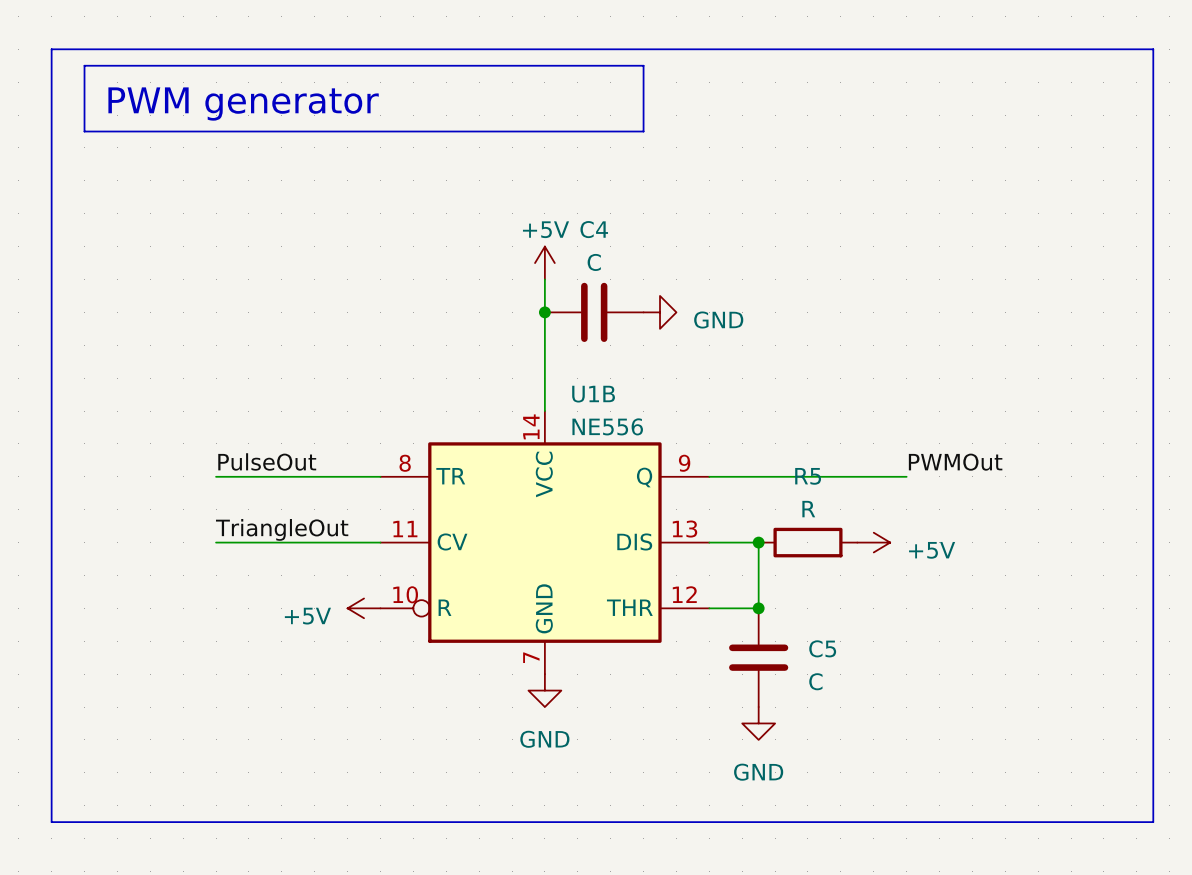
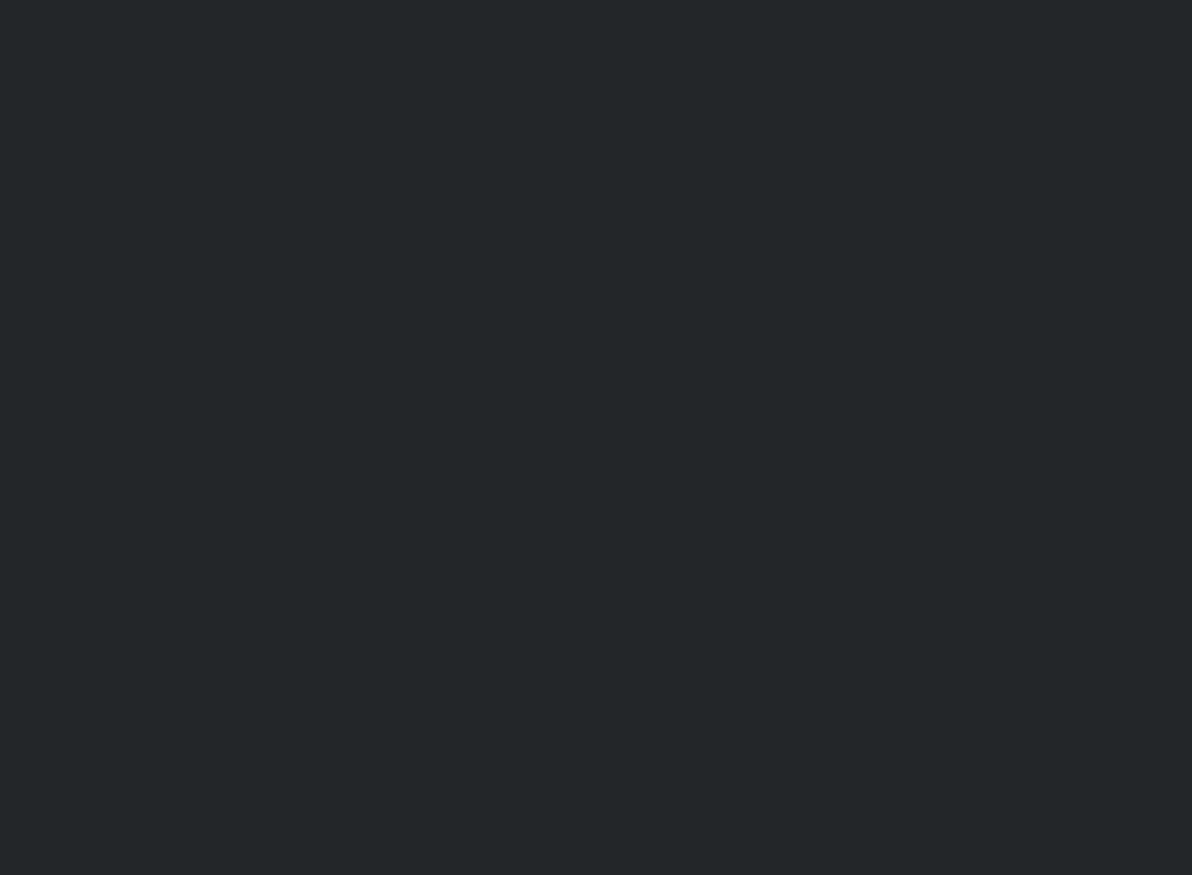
line: (51, 49) (1153, 49) (1153, 822) (51, 822) (51, 49) -> none
line: (84, 65) (643, 65) (643, 131) (84, 131) (84, 65) -> none
text: PWM generator (243, 104) -> none
power symbol: +5V (544, 263) -> none
wire: (544, 279) (544, 411) -> none
junction: (544, 312) -> none
C4: C (594, 312) -> none
power symbol: GND (660, 312) -> none
label: PulseOut (267, 461) -> none
label: PWMOut (955, 462) -> none
wire: (216, 476) (380, 476) -> none
wire: (709, 476) (906, 476) -> none
label: TriangleOut (282, 529) -> none
wire: (216, 542) (380, 542) -> none
U1B: NE556 (544, 542) -> none
wire: (709, 542) (758, 542) (758, 608) (709, 608) -> none
junction: (758, 542) -> none
R5: R (807, 542) -> none
power symbol: +5V (873, 542) -> none
power symbol: +5V (364, 608) -> none
junction: (758, 608) -> none
C5: C (758, 657) -> none
power symbol: GND (544, 690) -> none
power symbol: GND (758, 723) -> none

